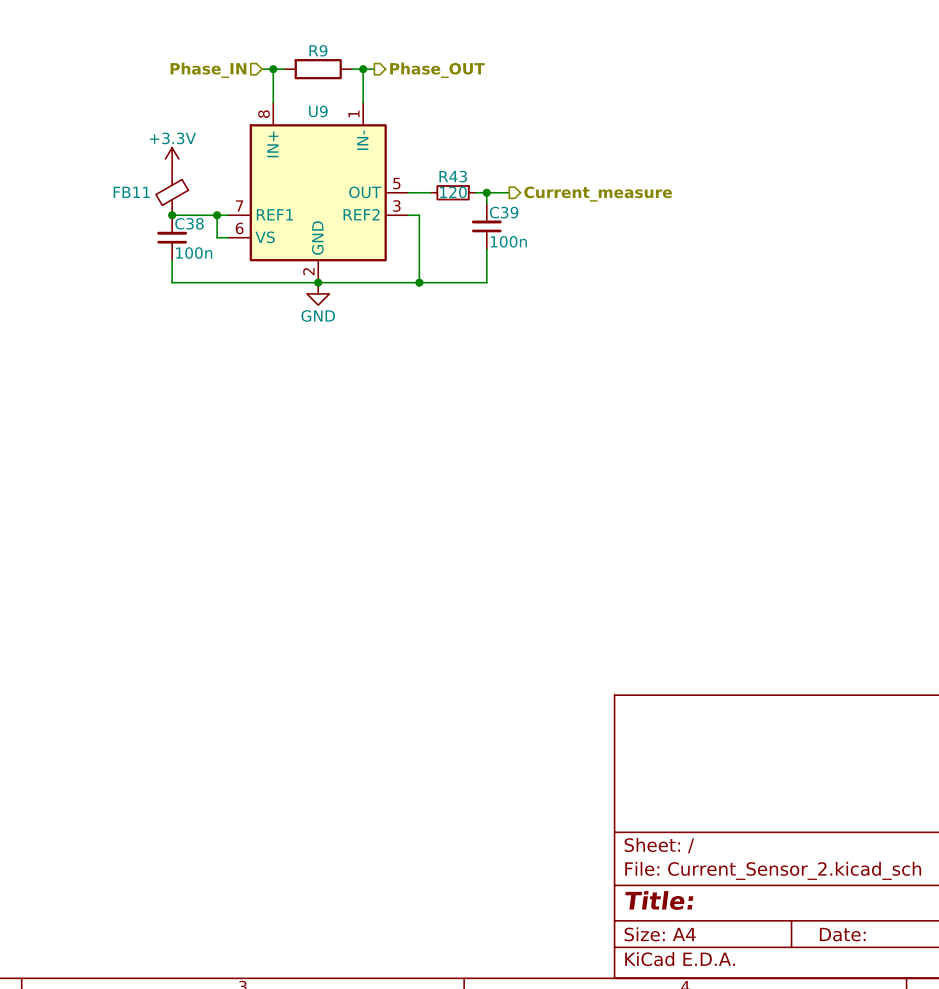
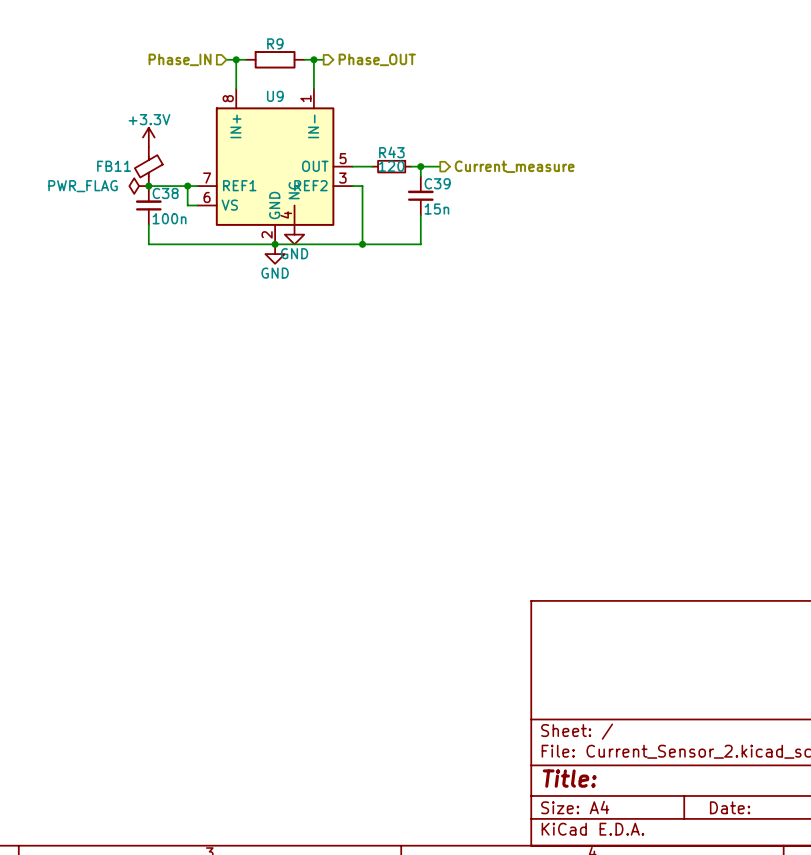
U9 symbol: [228, 102, 409, 283] -> [197, 88, 353, 245]
power symbol: none -> PWR_FLAG (139, 186)
C39 value: 100n (508, 241) -> 15n (436, 209)
power symbol: none -> GND (294, 234)

